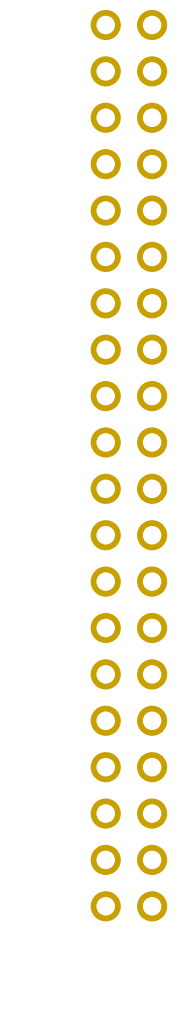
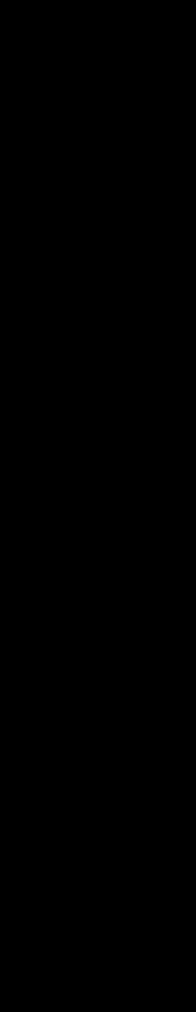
part: (128, 465) -> none

